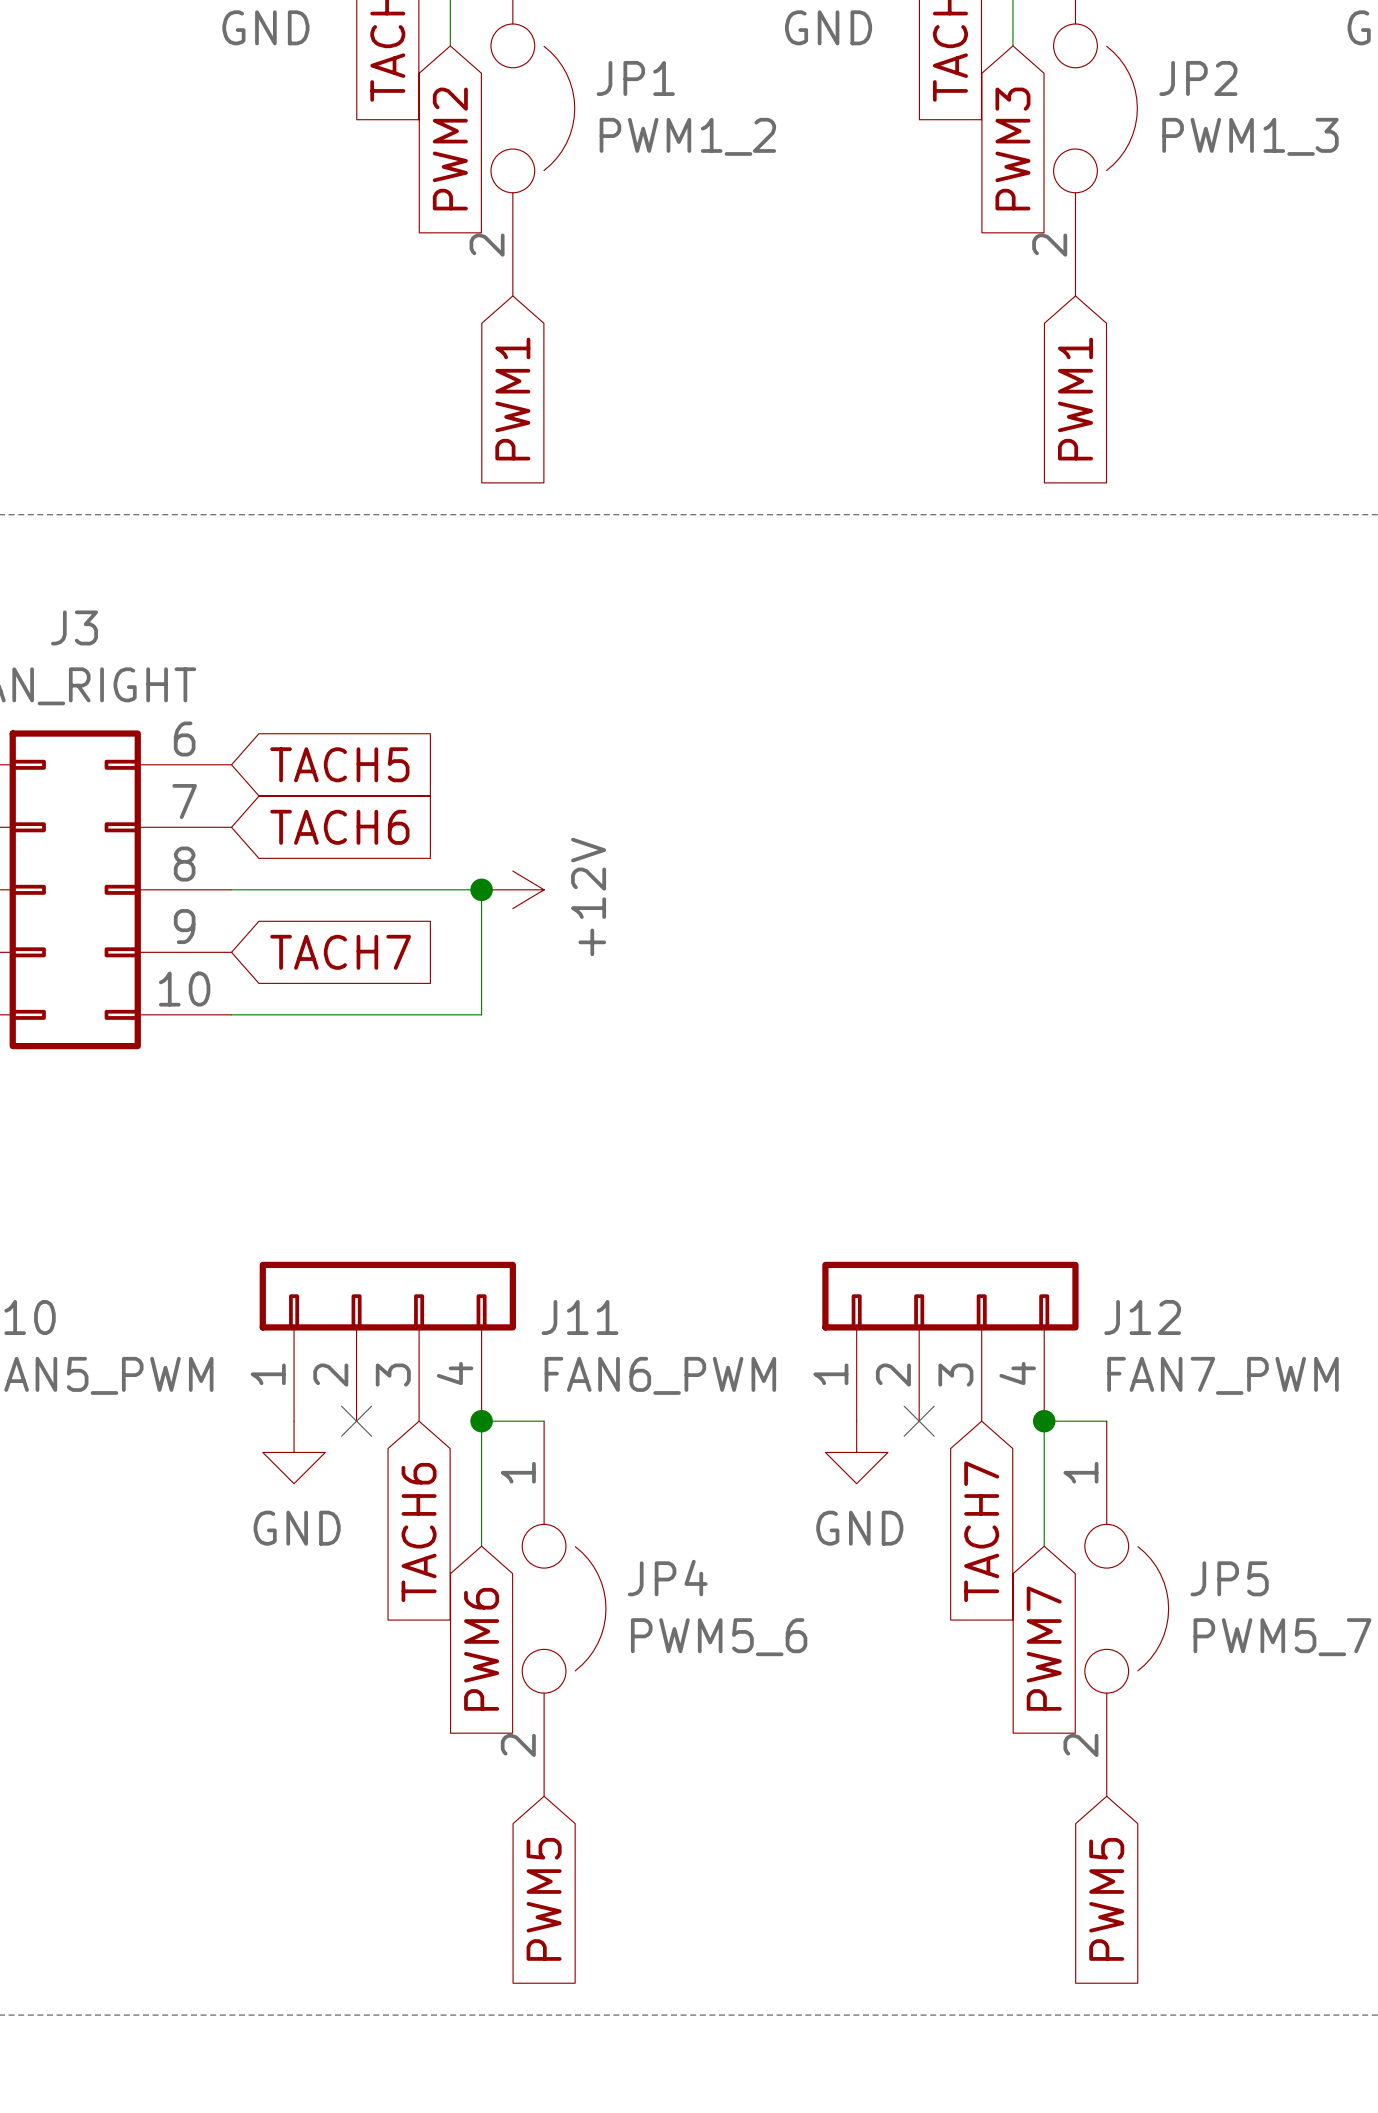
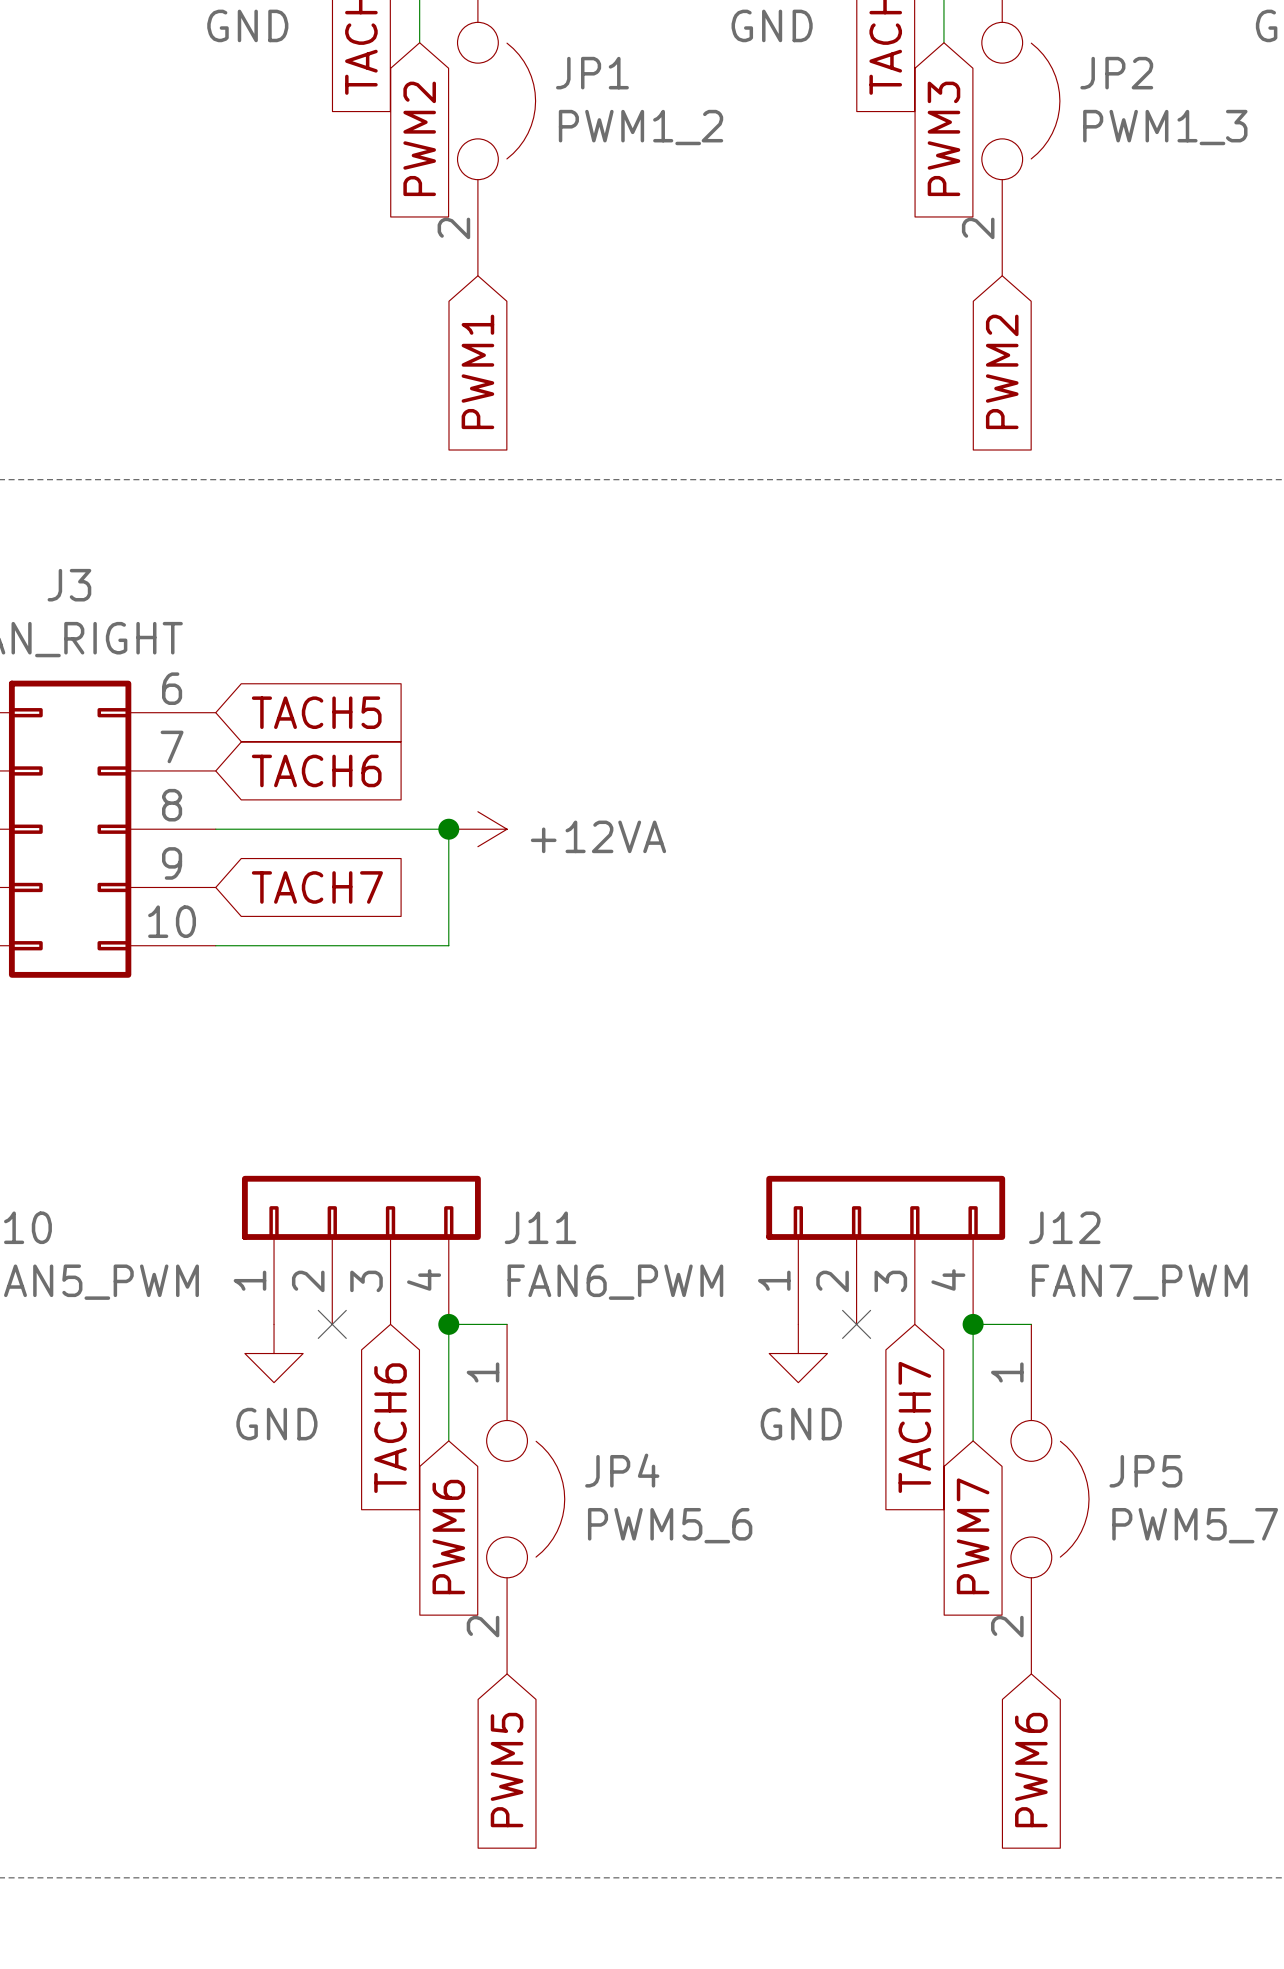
global label: PWM1 (1075, 399) -> PWM2 (1002, 371)
power symbol: +12V (512, 889) -> +12VA (477, 829)
global label: PWM5 (1106, 1899) -> PWM6 (1031, 1770)

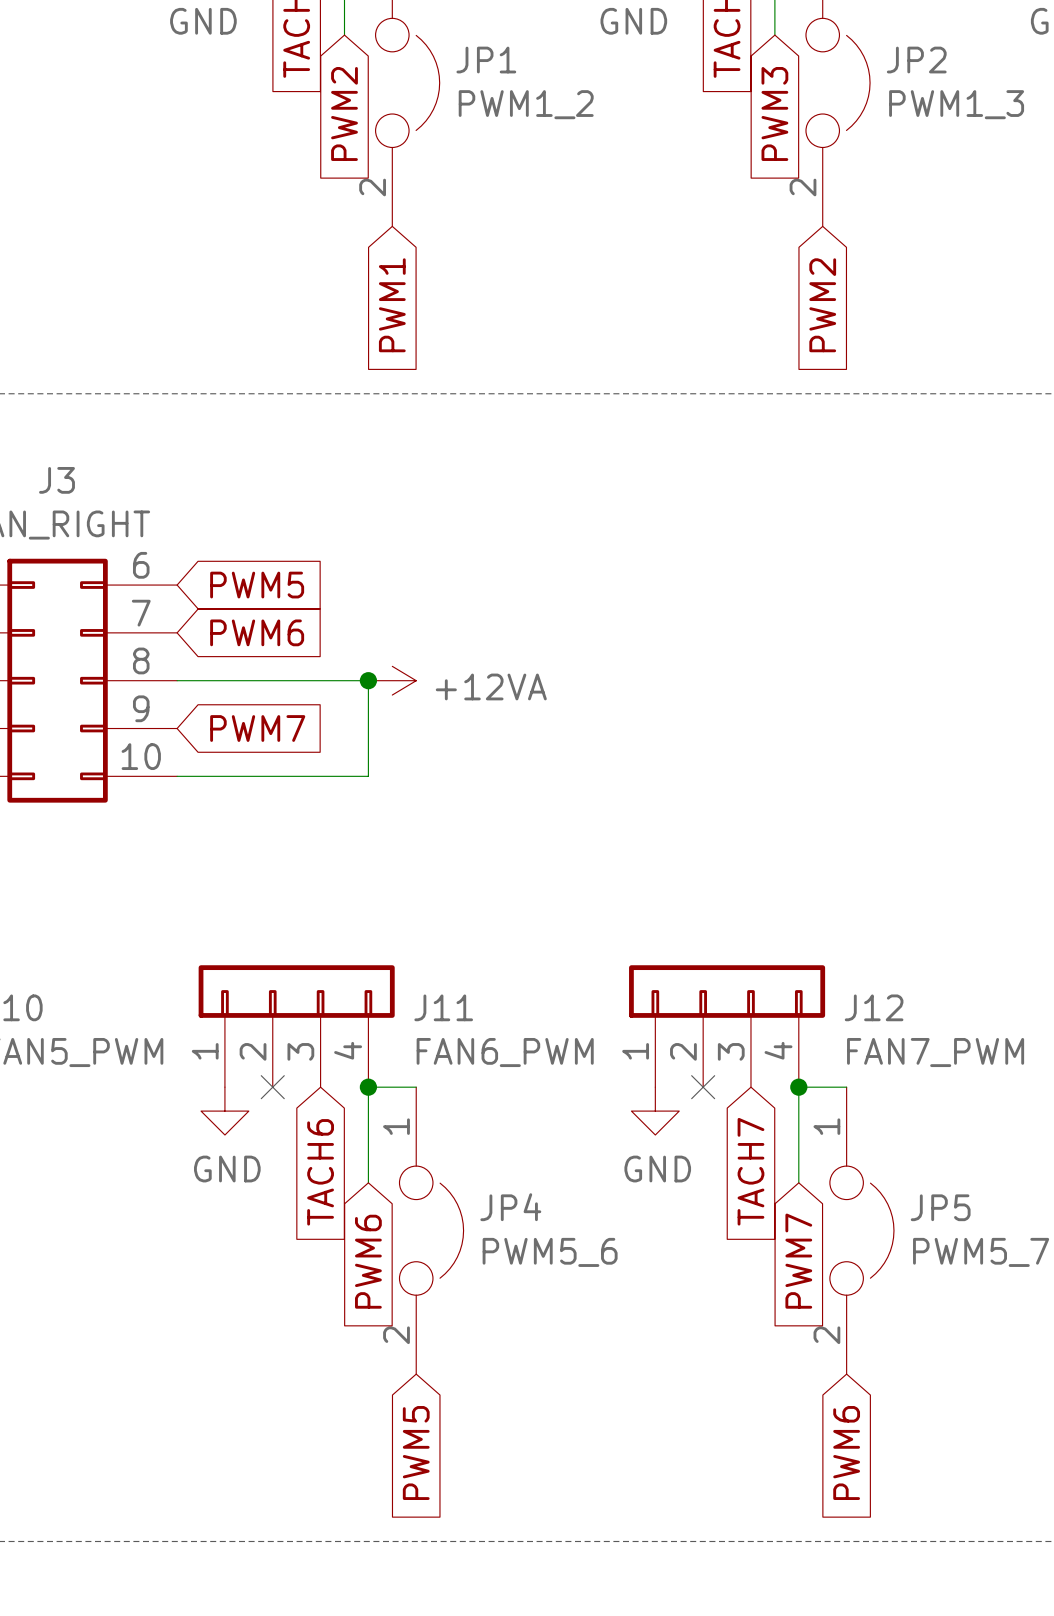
global label: TACH5 (316, 712) -> PWM5 (257, 585)
global label: TACH6 (316, 770) -> PWM6 (257, 632)
global label: TACH7 (317, 887) -> PWM7 (257, 728)

